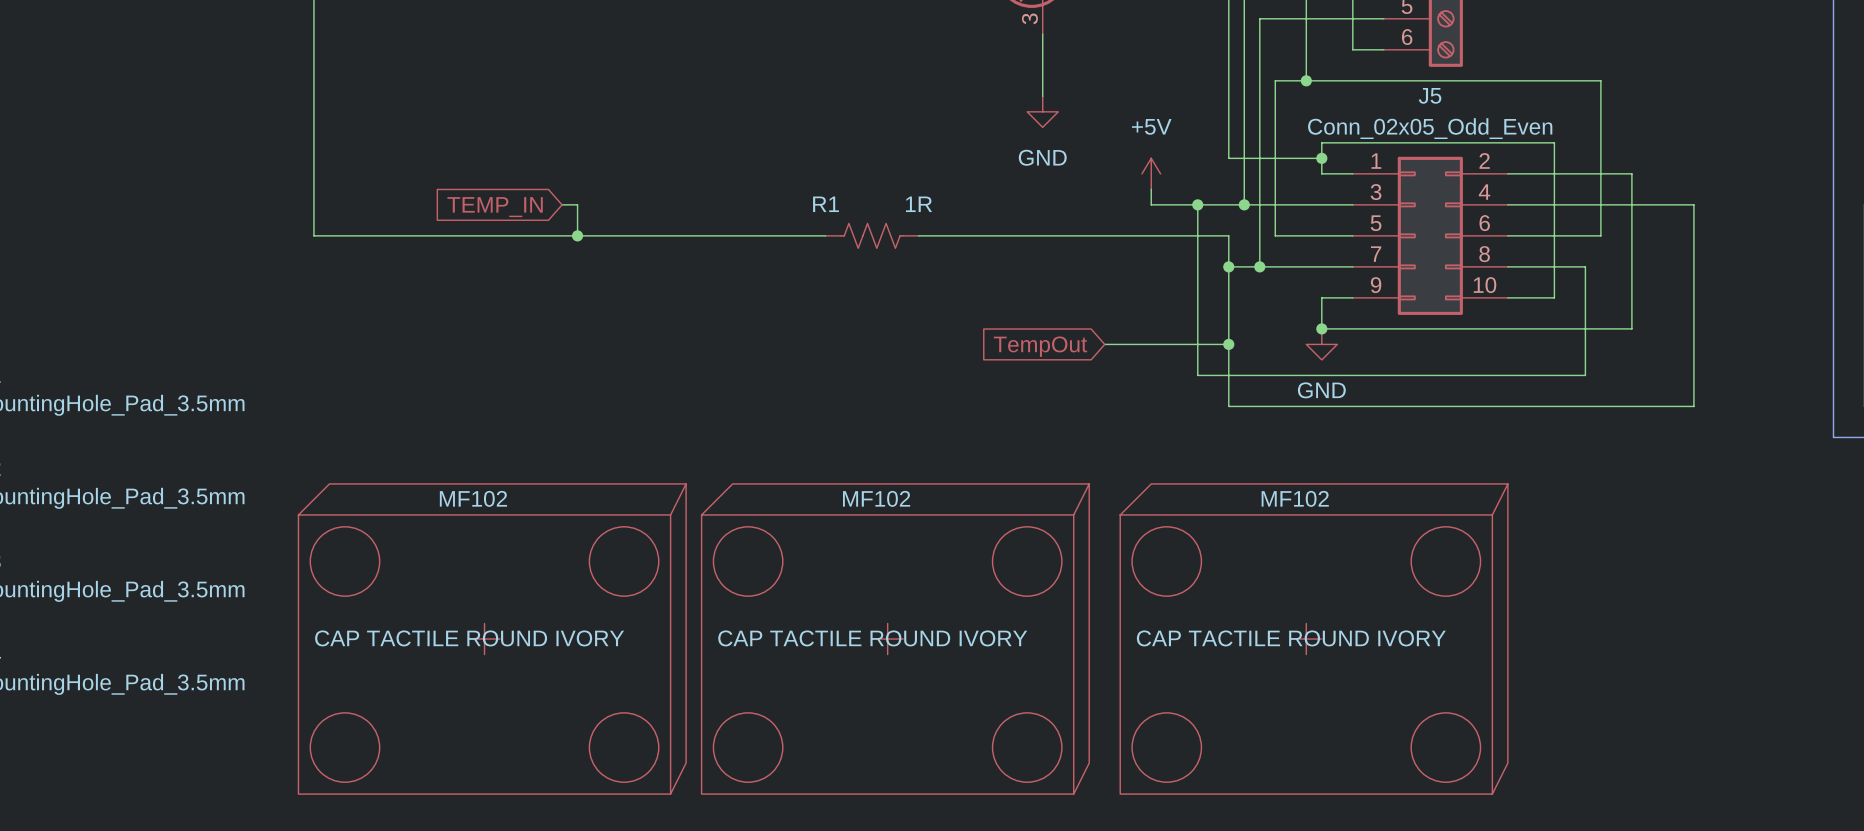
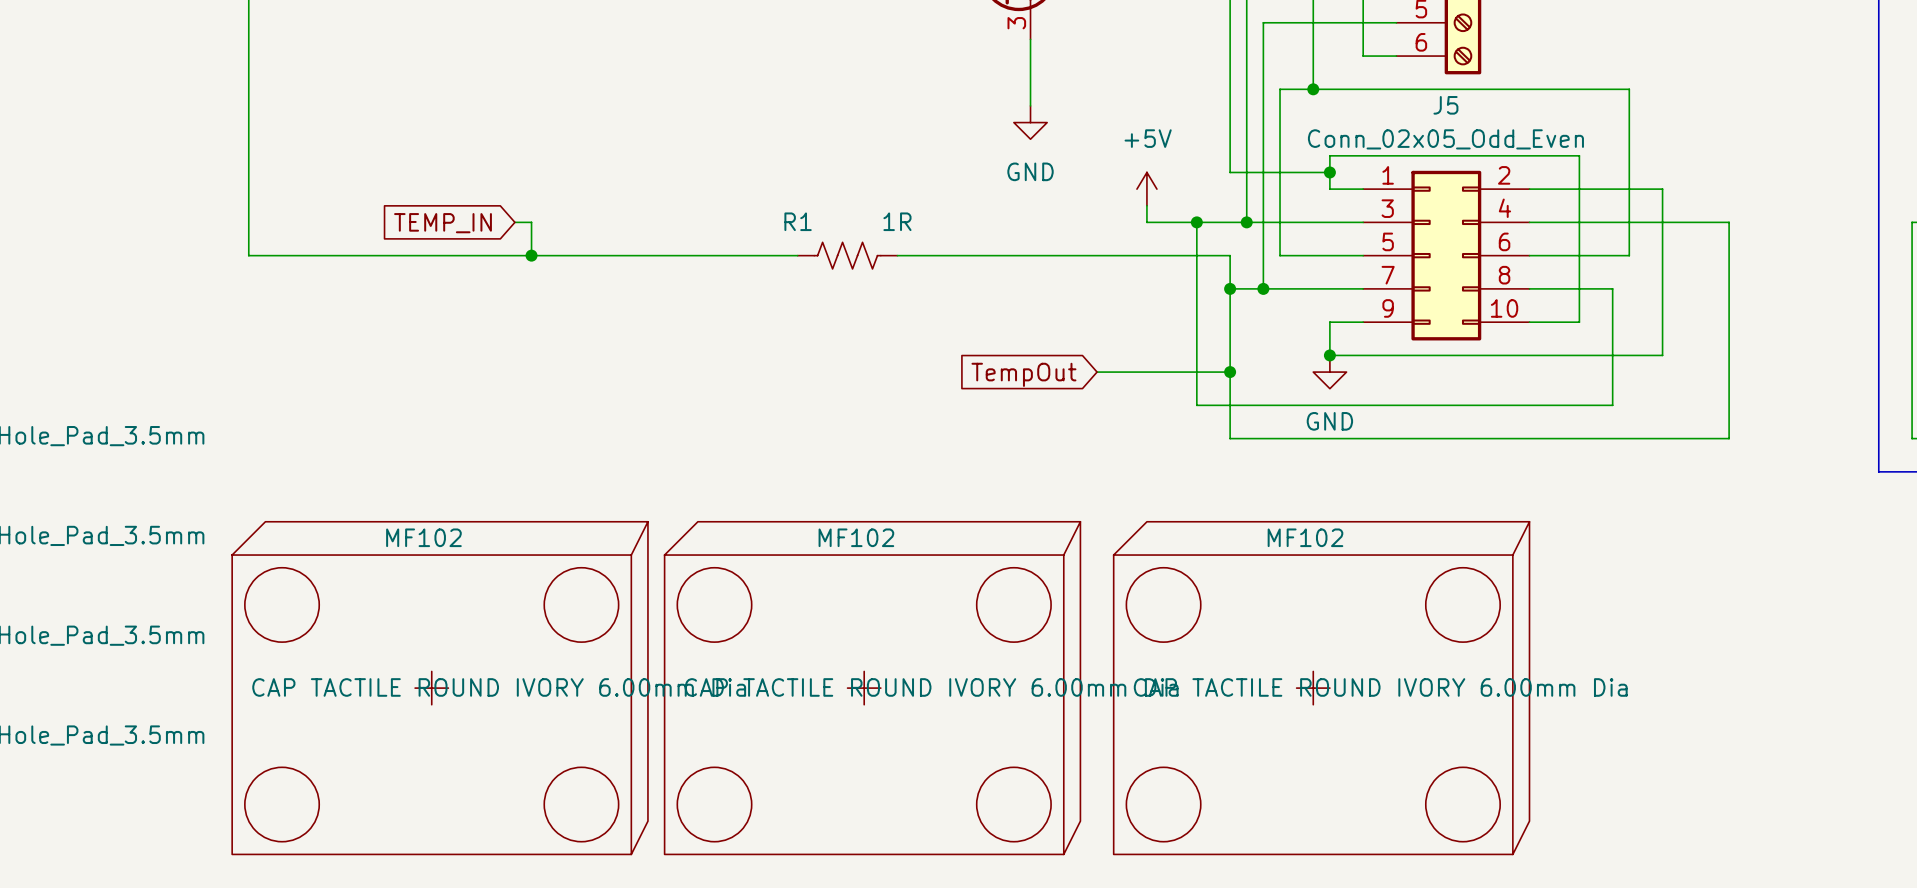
MF102 value: CAP TACTILE ROUND IVORY (469, 638) -> CAP TACTILE ROUND IVORY 6.00mm Dia (499, 687)
MF102 value: CAP TACTILE ROUND IVORY (872, 638) -> CAP TACTILE ROUND IVORY 6.00mm Dia (931, 687)
MF102 value: CAP TACTILE ROUND IVORY (1291, 638) -> CAP TACTILE ROUND IVORY 6.00mm Dia (1380, 687)

